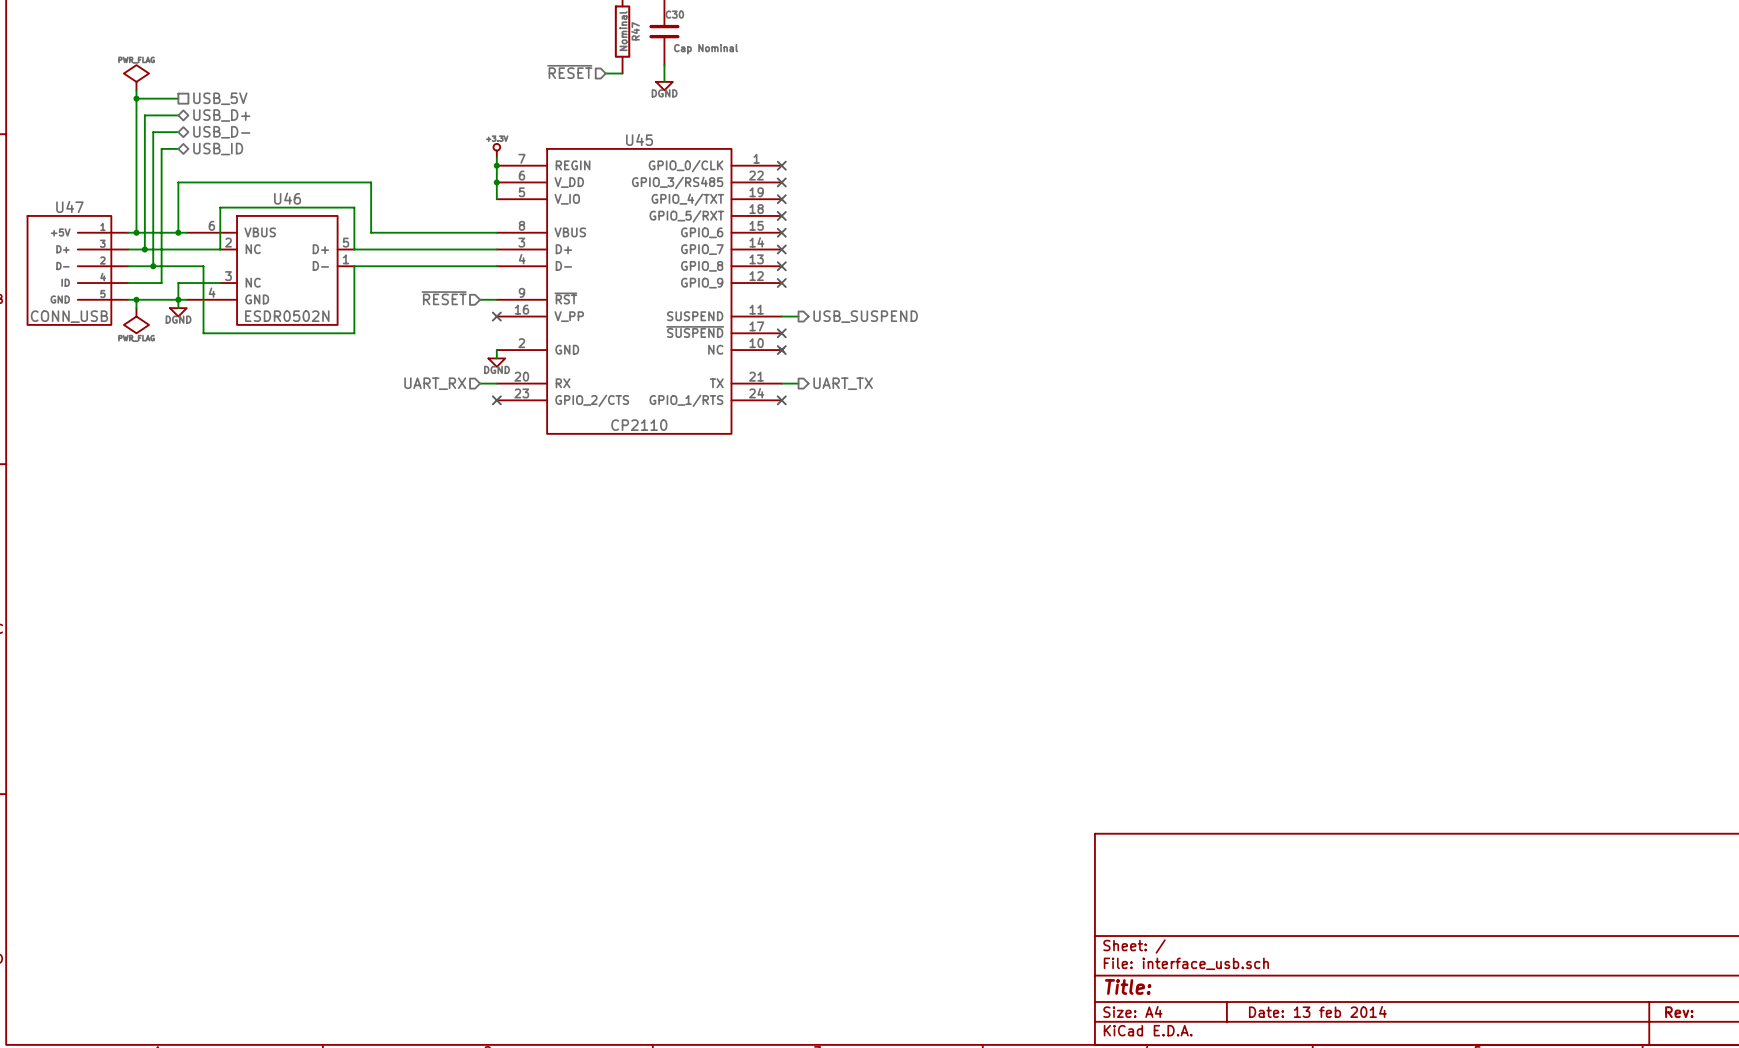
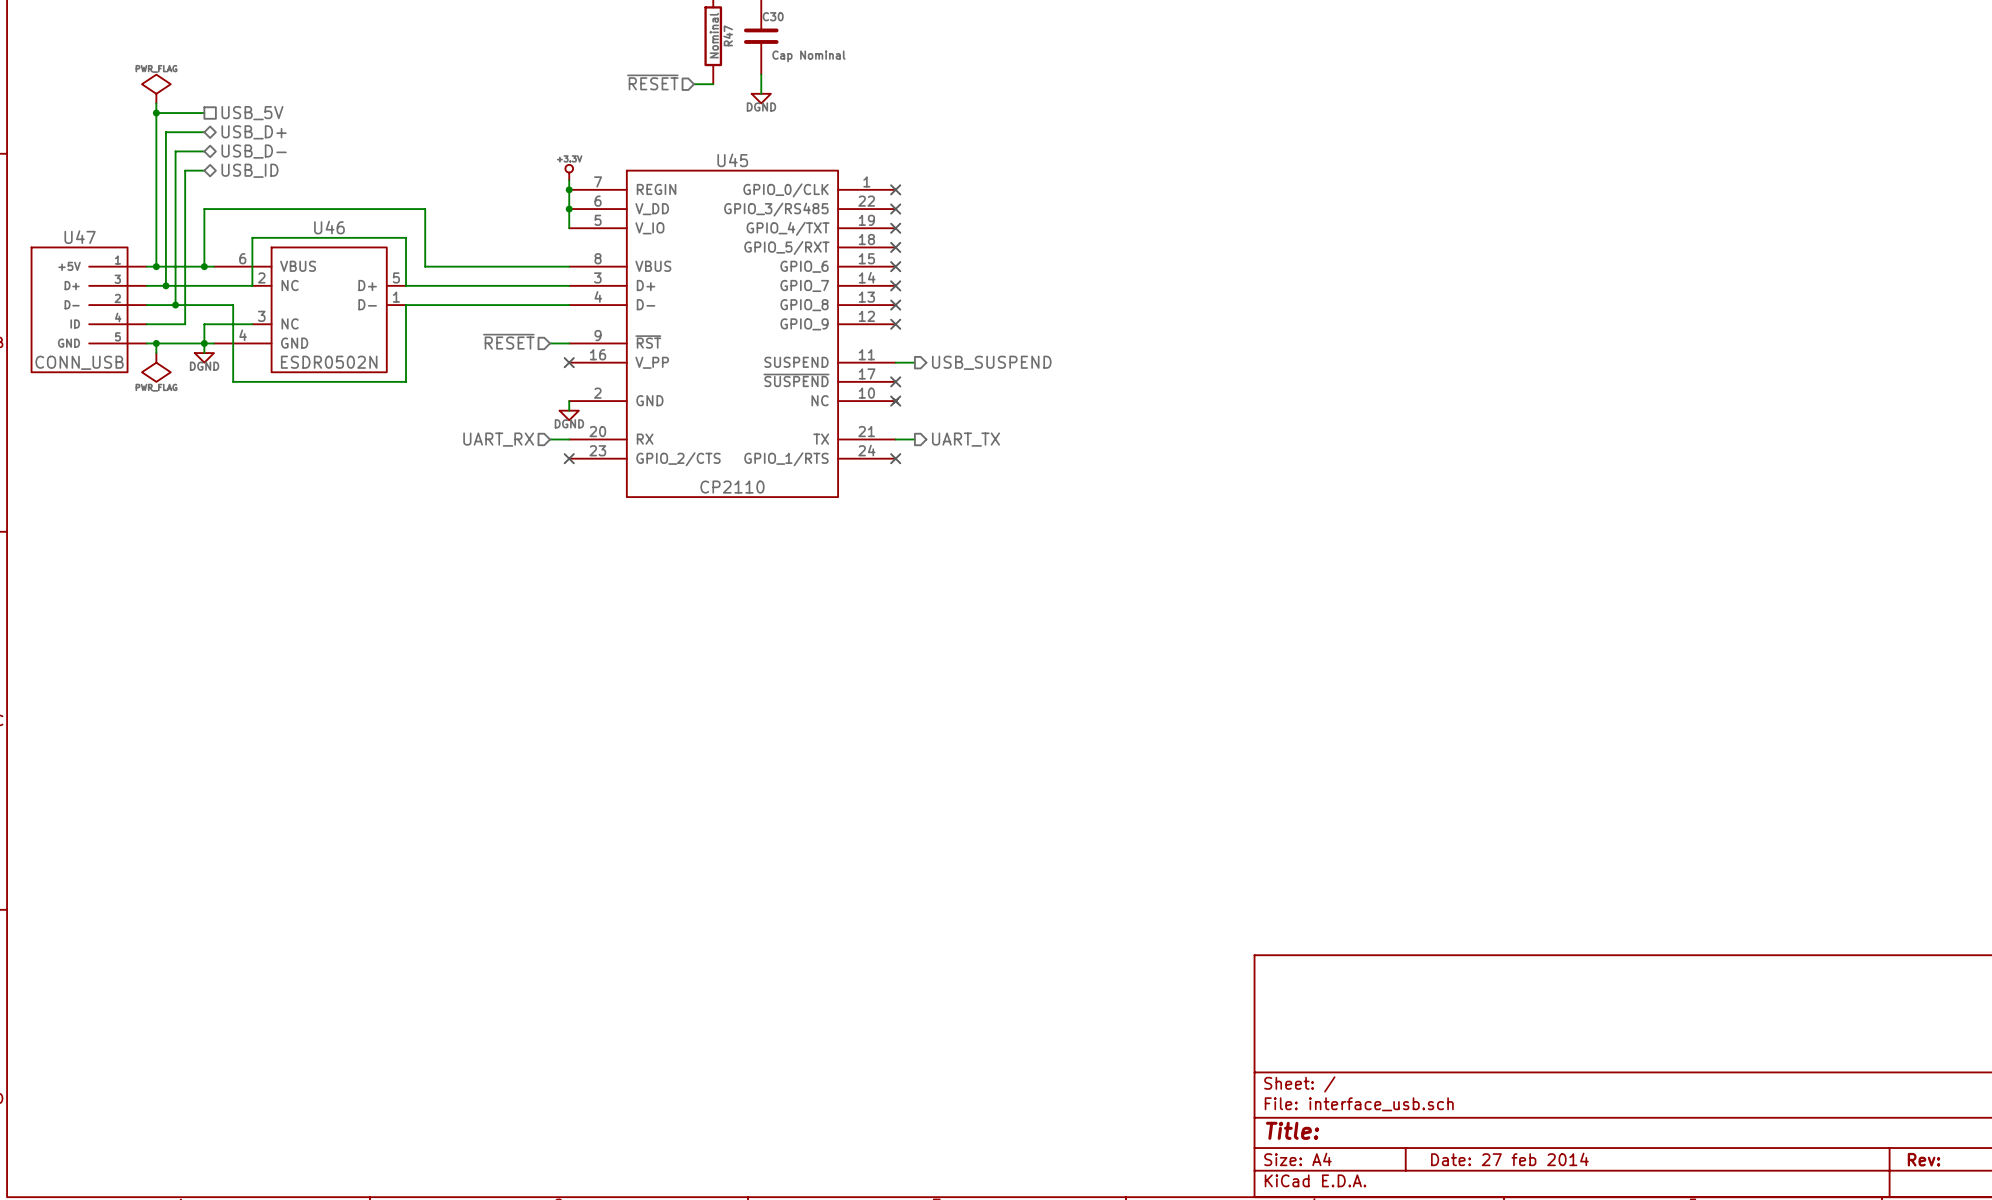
title block: Date: 13 feb 2014 (1317, 1011) -> Date: 27 feb 2014 (1509, 1159)

